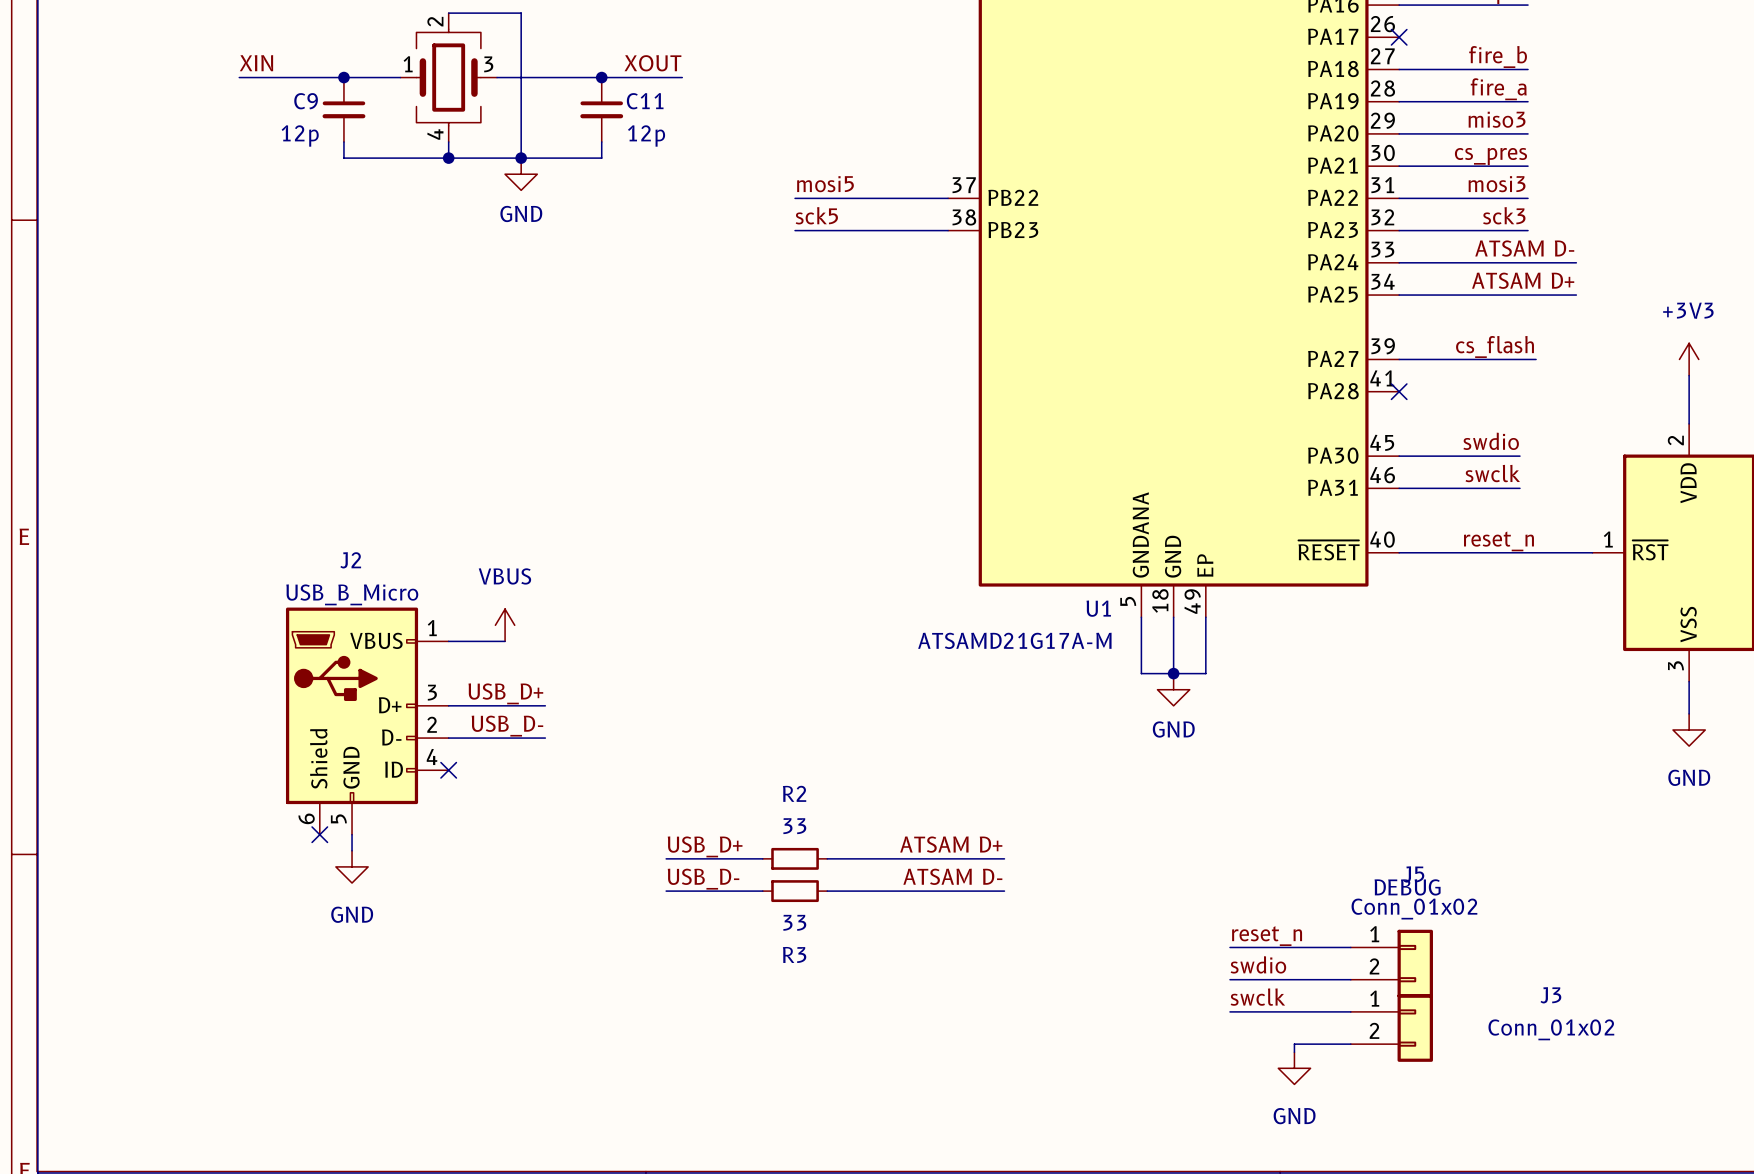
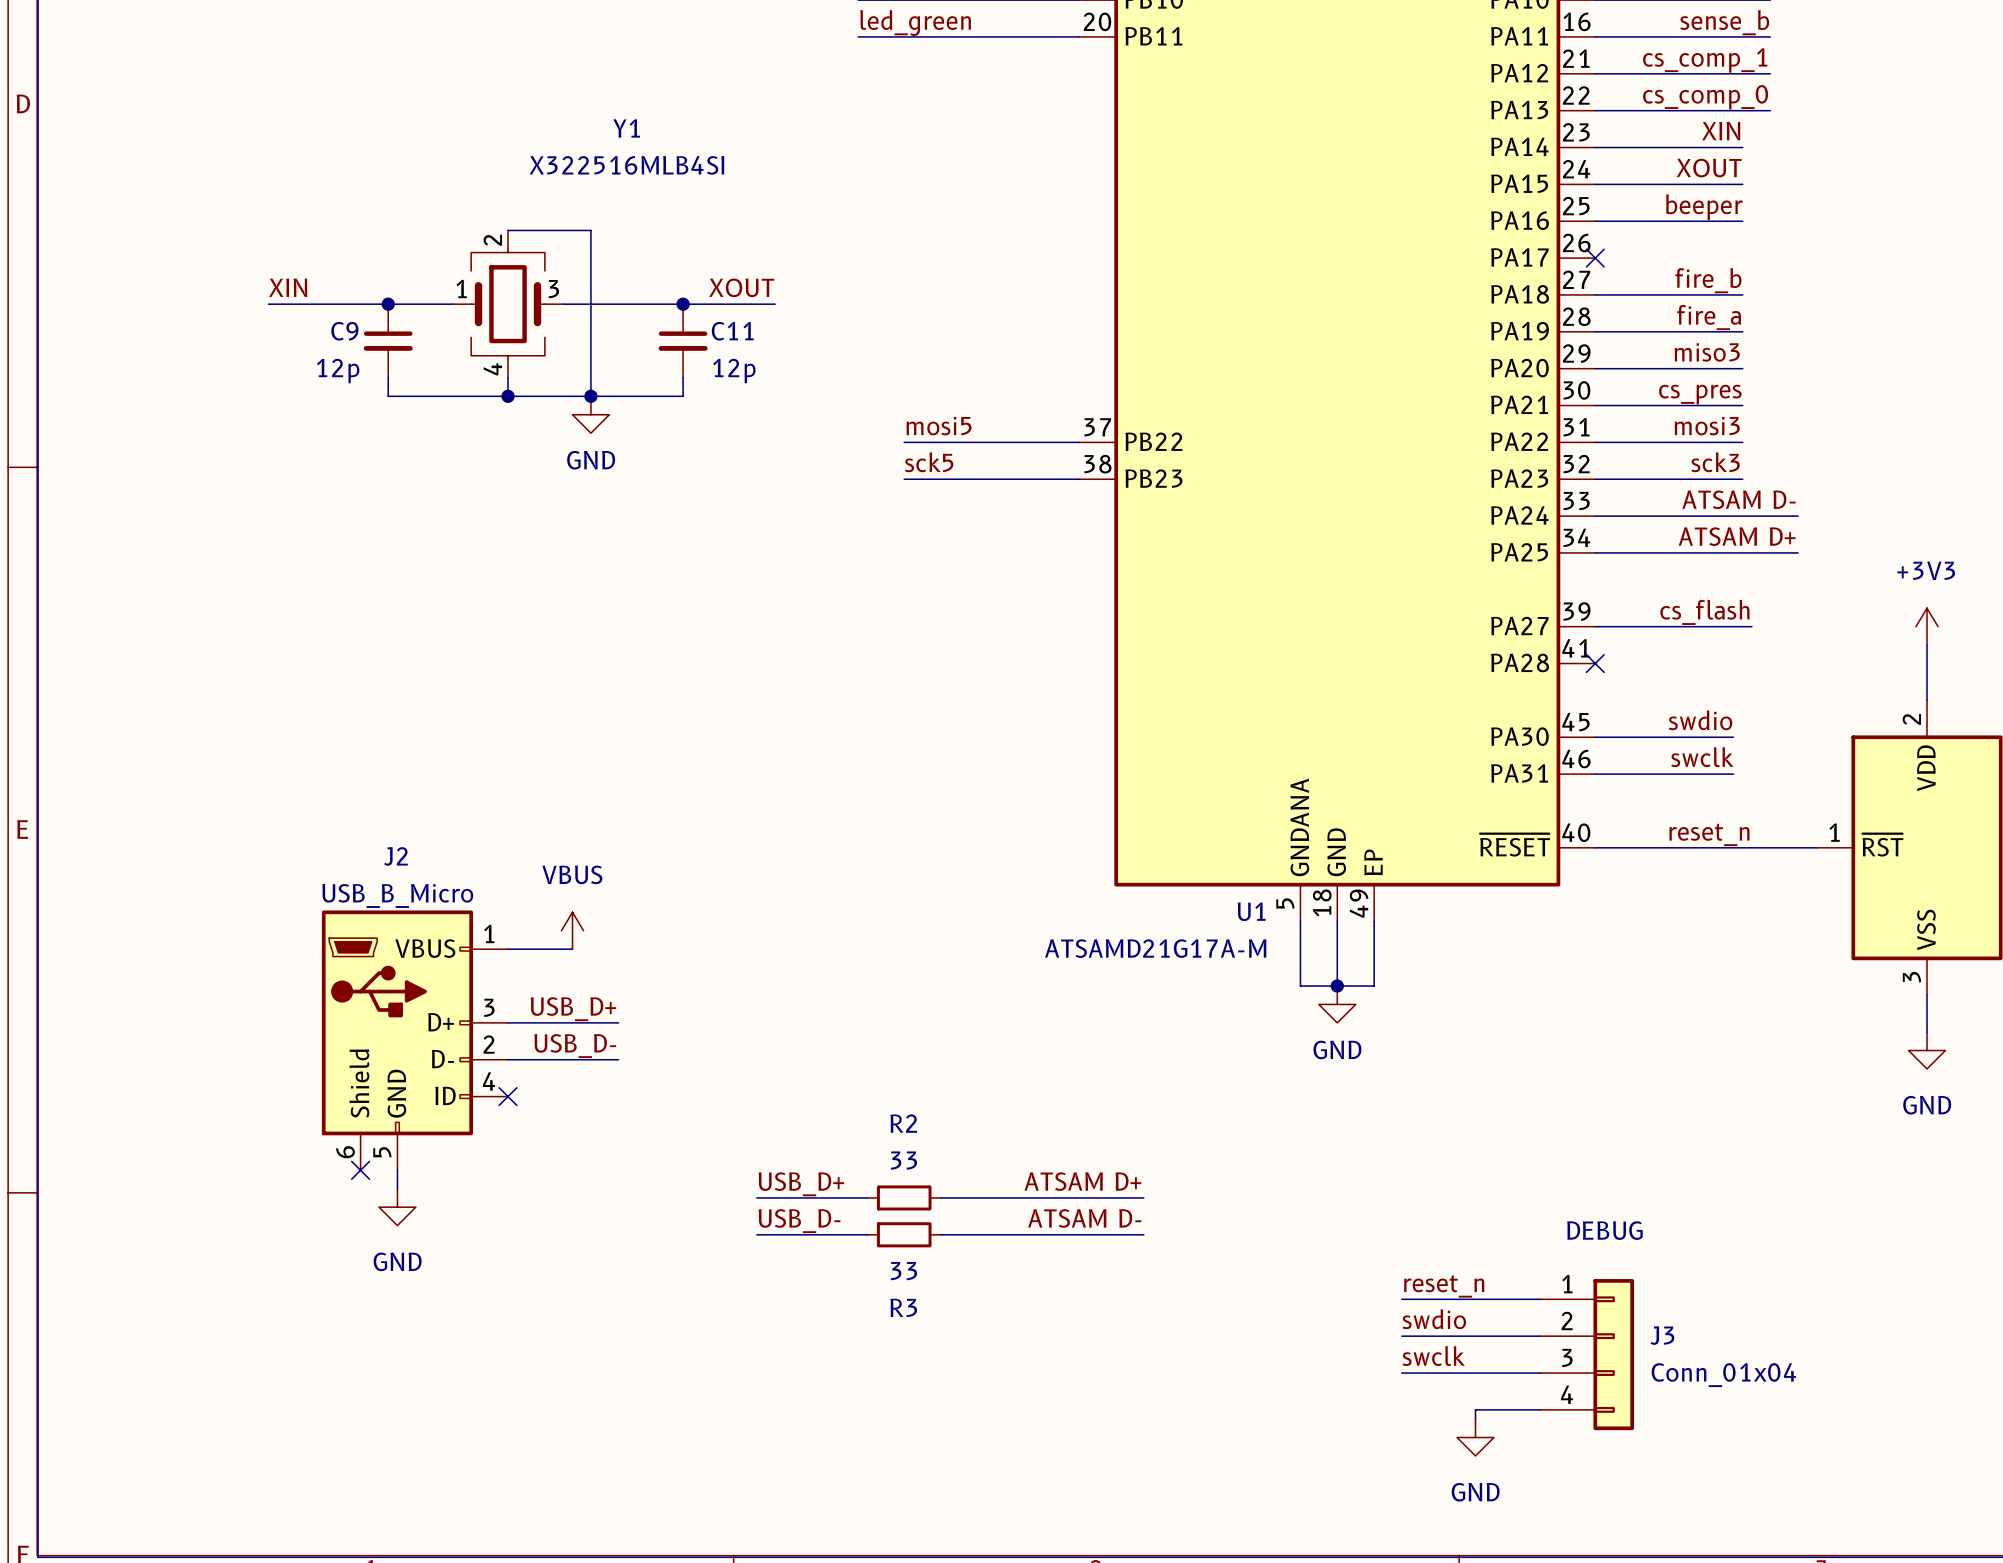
J5: Conn_01x02 (1391, 963) -> none
J3 symbol: [1350, 994, 1433, 1062] -> [1540, 1279, 1634, 1431]
J3 name position: J3 (1550, 995) -> J3 (1662, 1335)
J3 value: Conn_01x02 (1551, 1029) -> Conn_01x04 (1723, 1375)

